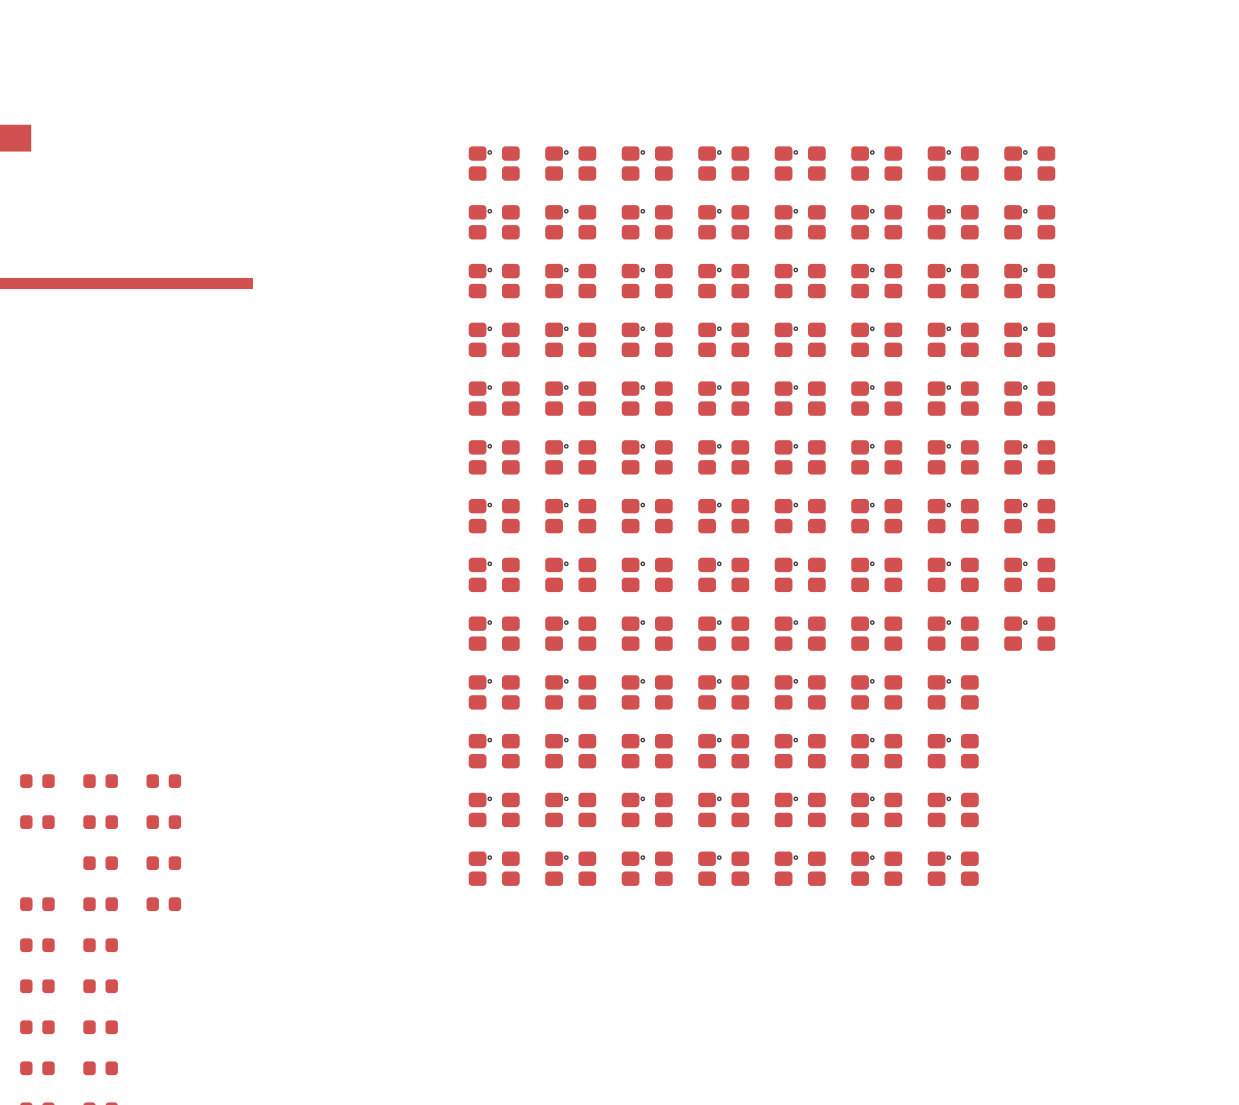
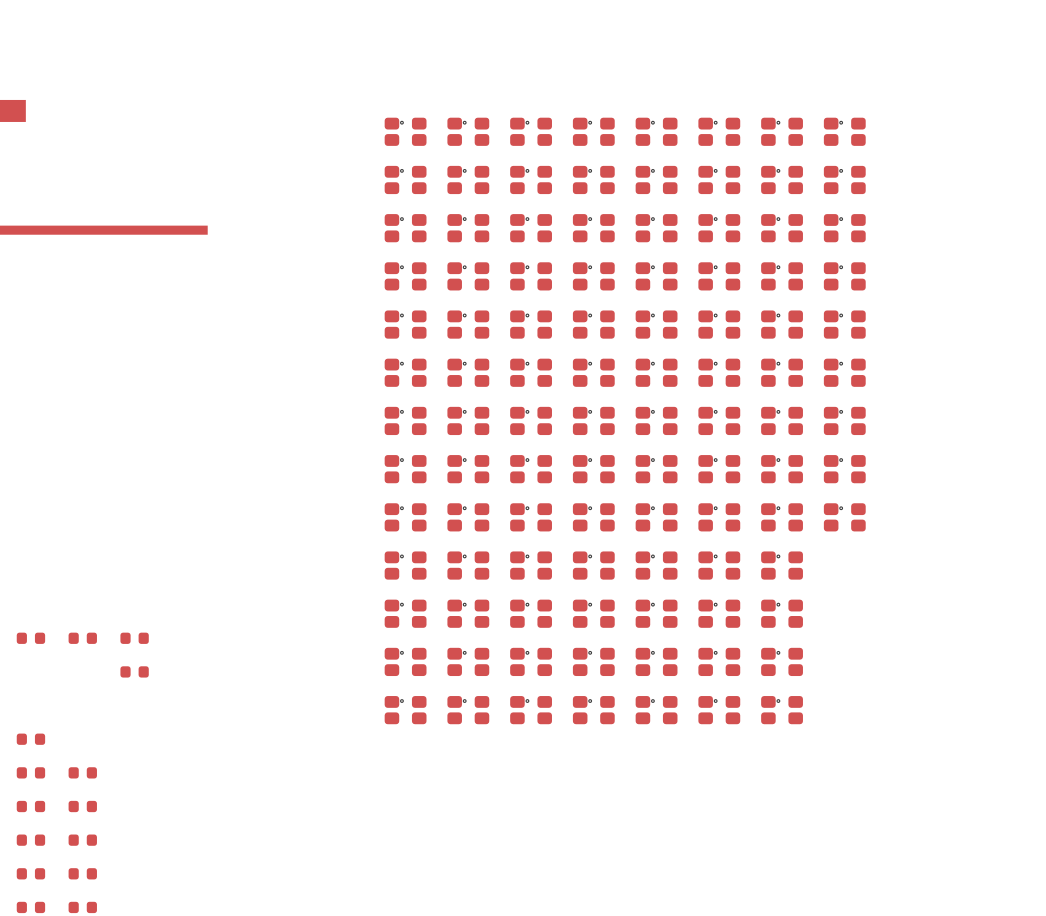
part: (37, 822) -> none
part: (100, 822) -> none
part: (100, 863) -> none
part: (163, 863) -> none
part: (100, 904) -> none
part: (163, 904) -> none

